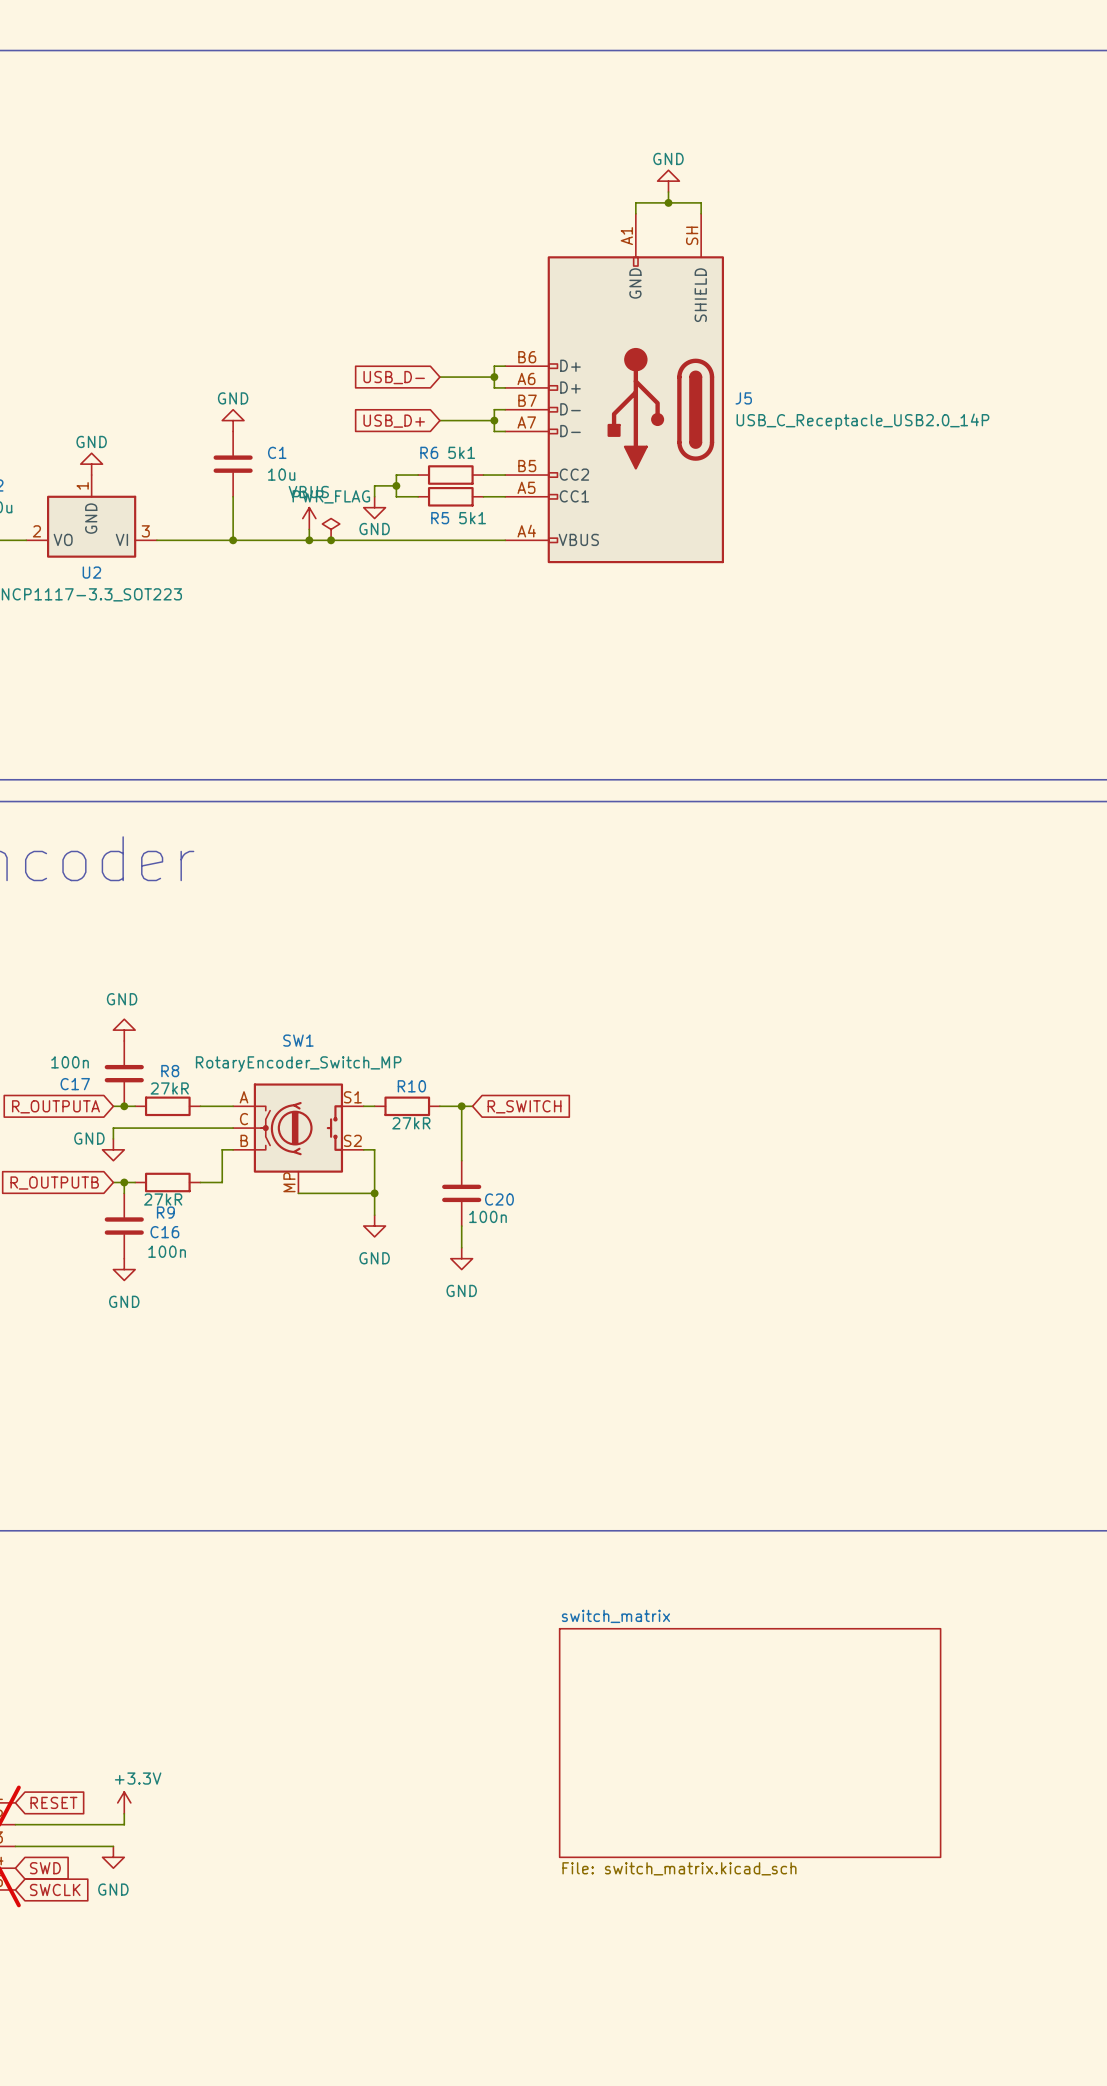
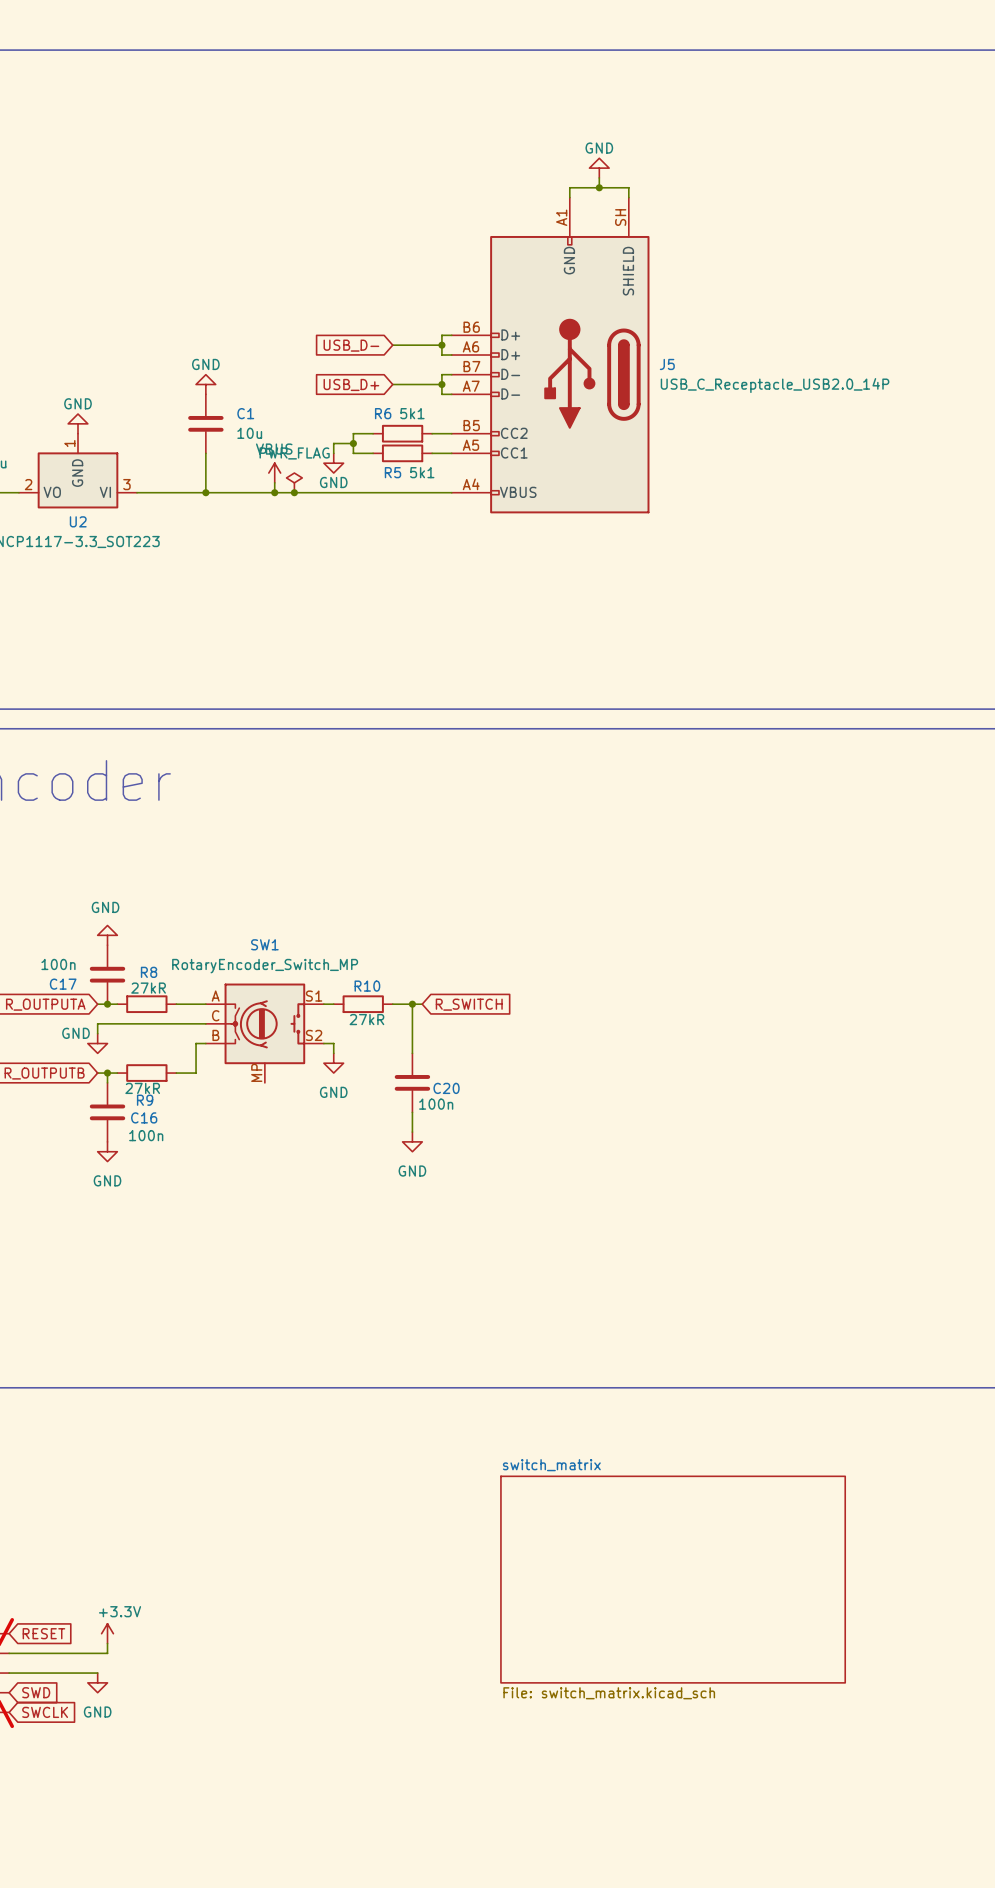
wire: (374, 1160) (374, 1215) -> none
wire: (298, 1193) (374, 1193) -> none
junction: (374, 1193) -> none
power symbol position: GND (374, 1226) -> GND (333, 1063)

